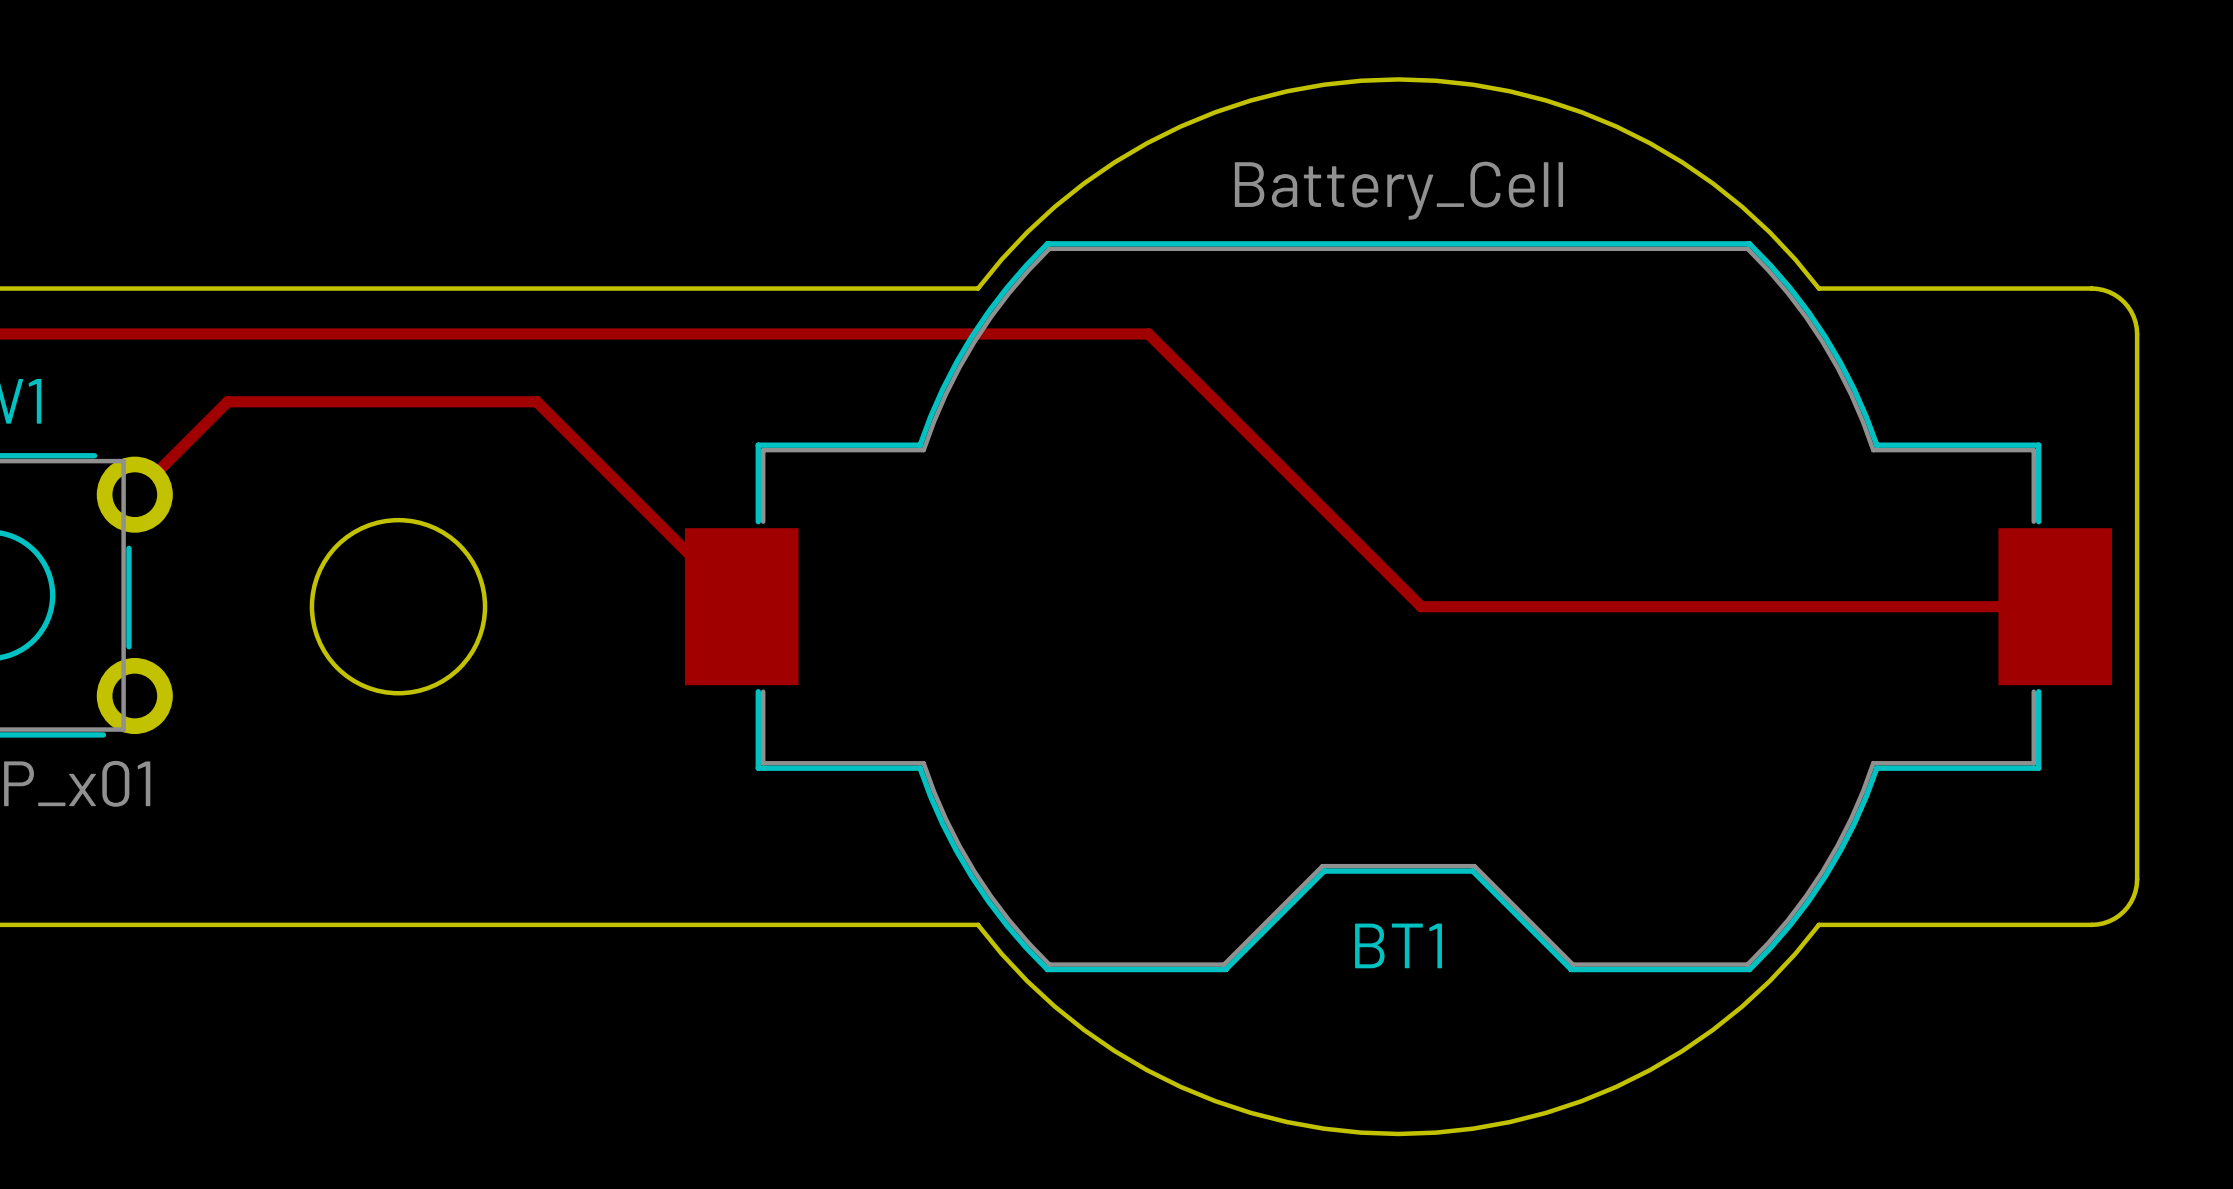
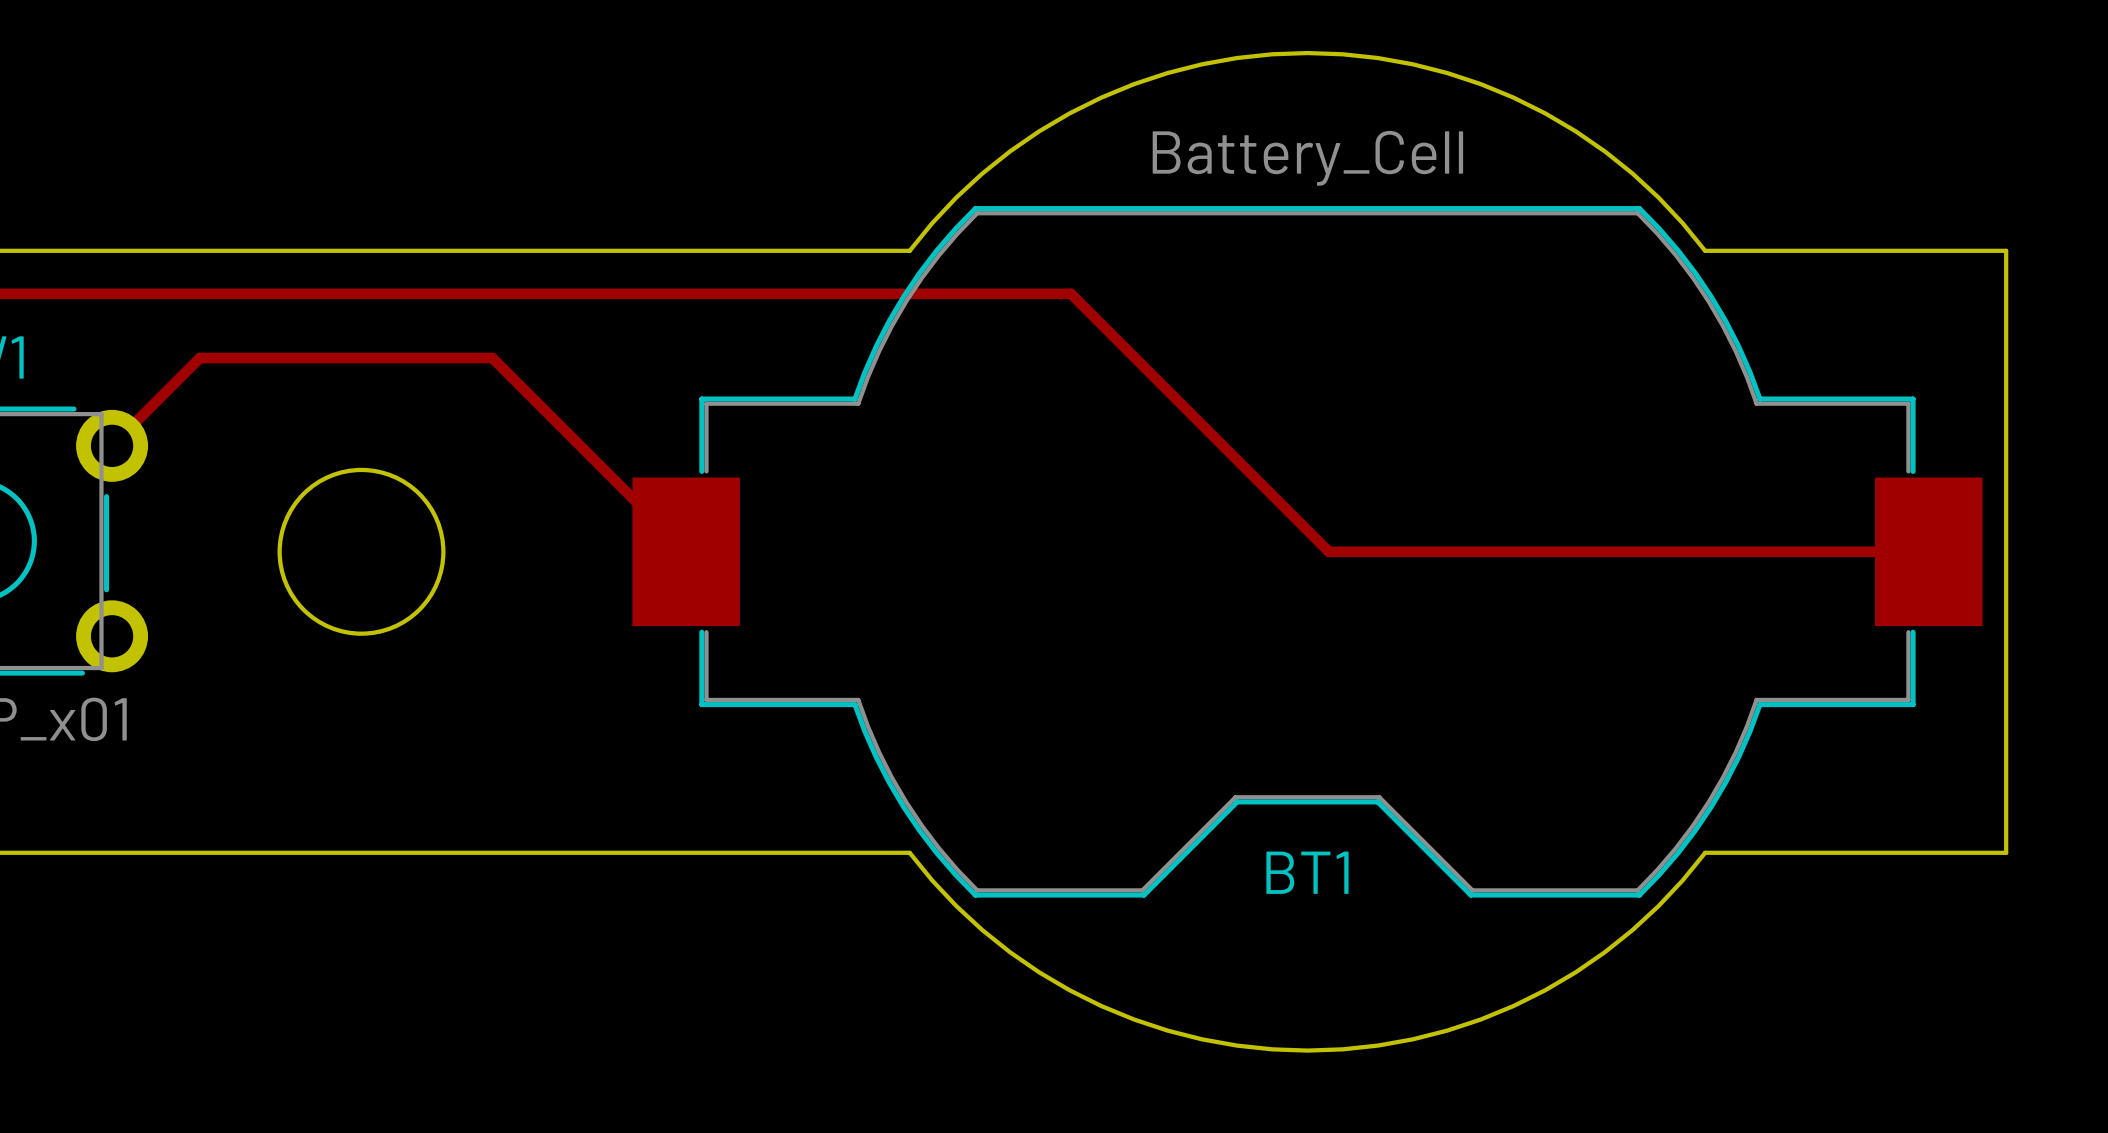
board edge: (2091, 288) (2109, 291) (2123, 301) (2133, 316) (2137, 333) -> (1963, 250) (2006, 250) (2006, 293)
board edge: (2137, 879) (2133, 896) (2123, 911) (2109, 921) (2091, 924) -> (2006, 809) (2006, 852) (1963, 852)

